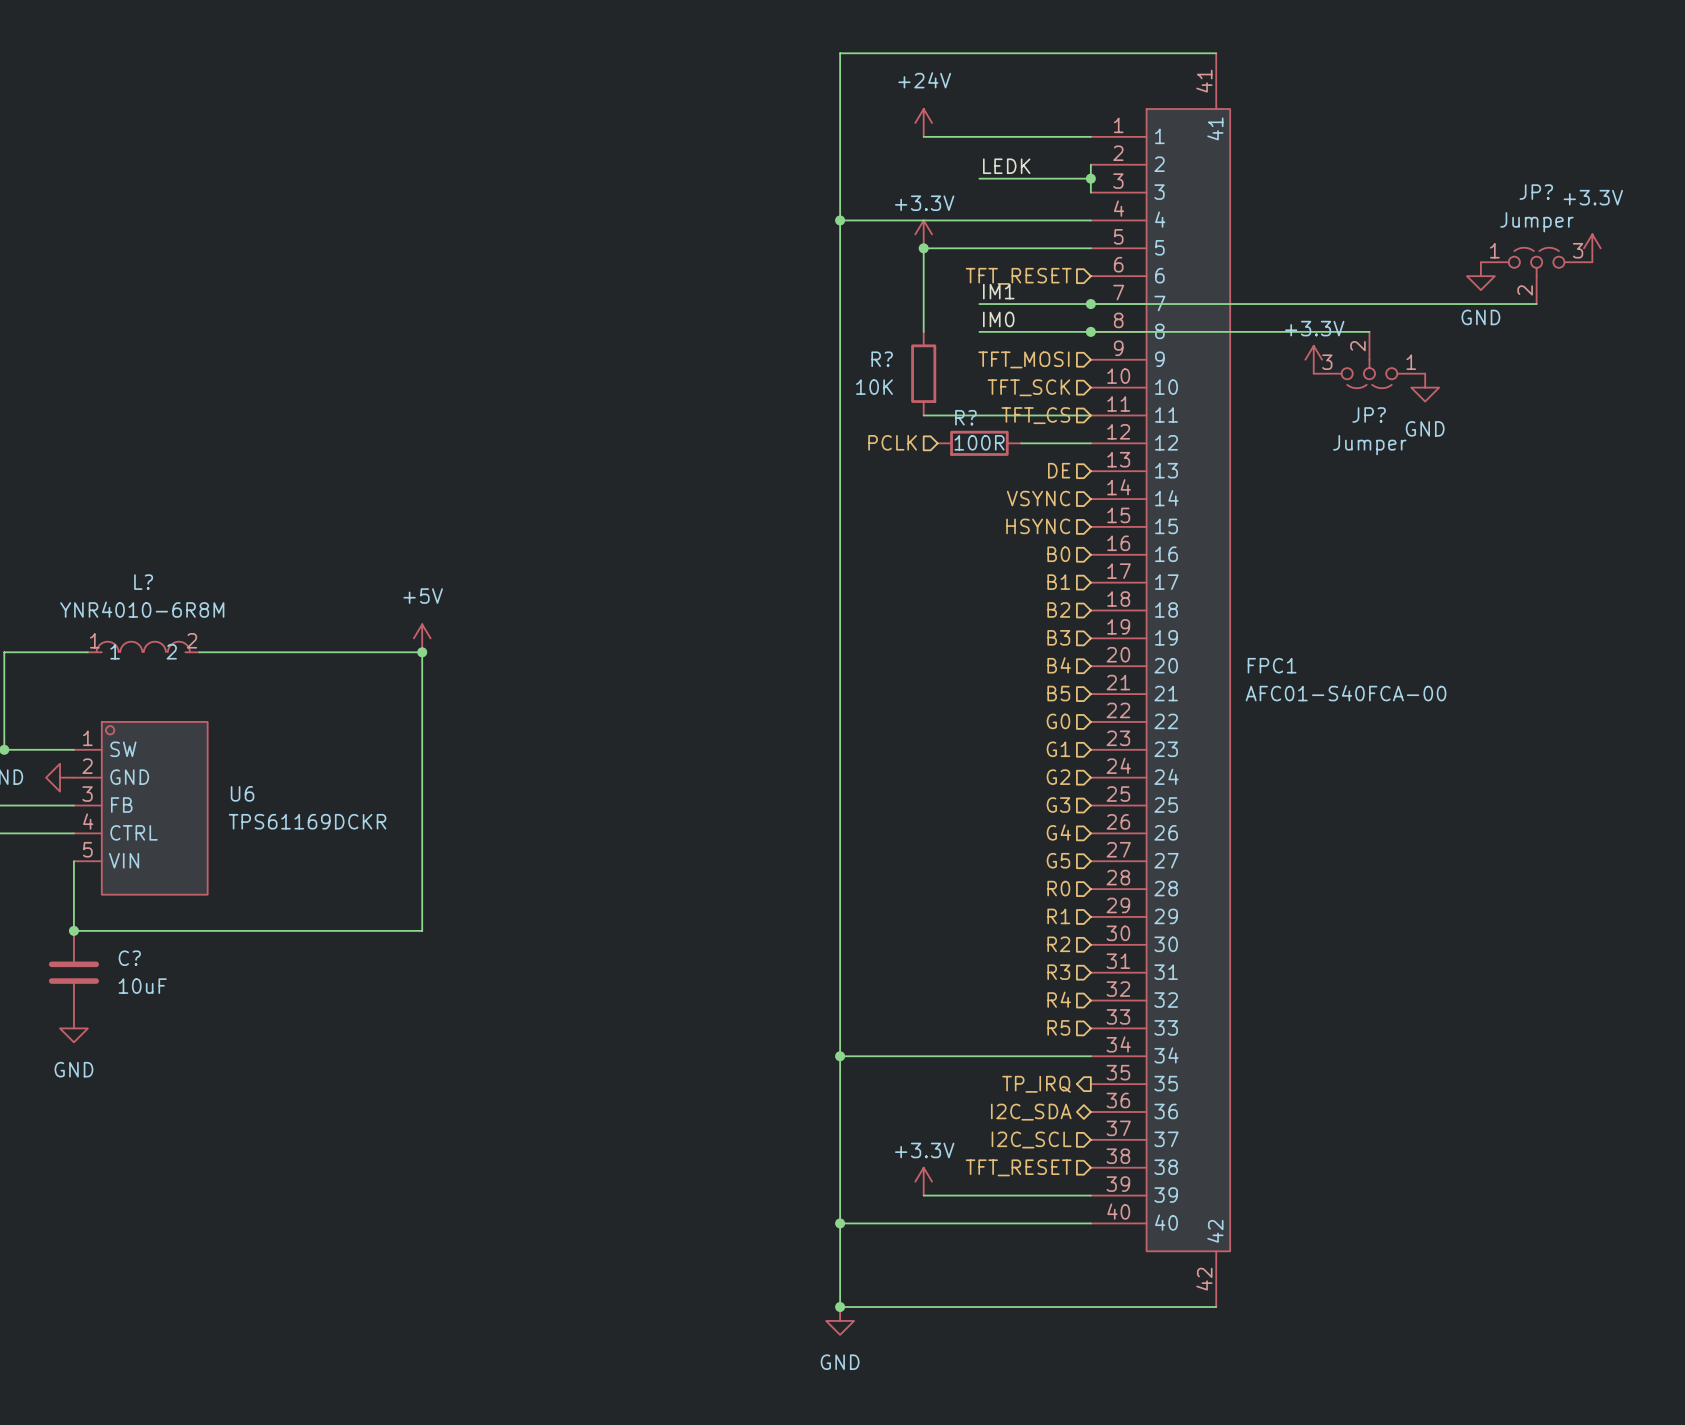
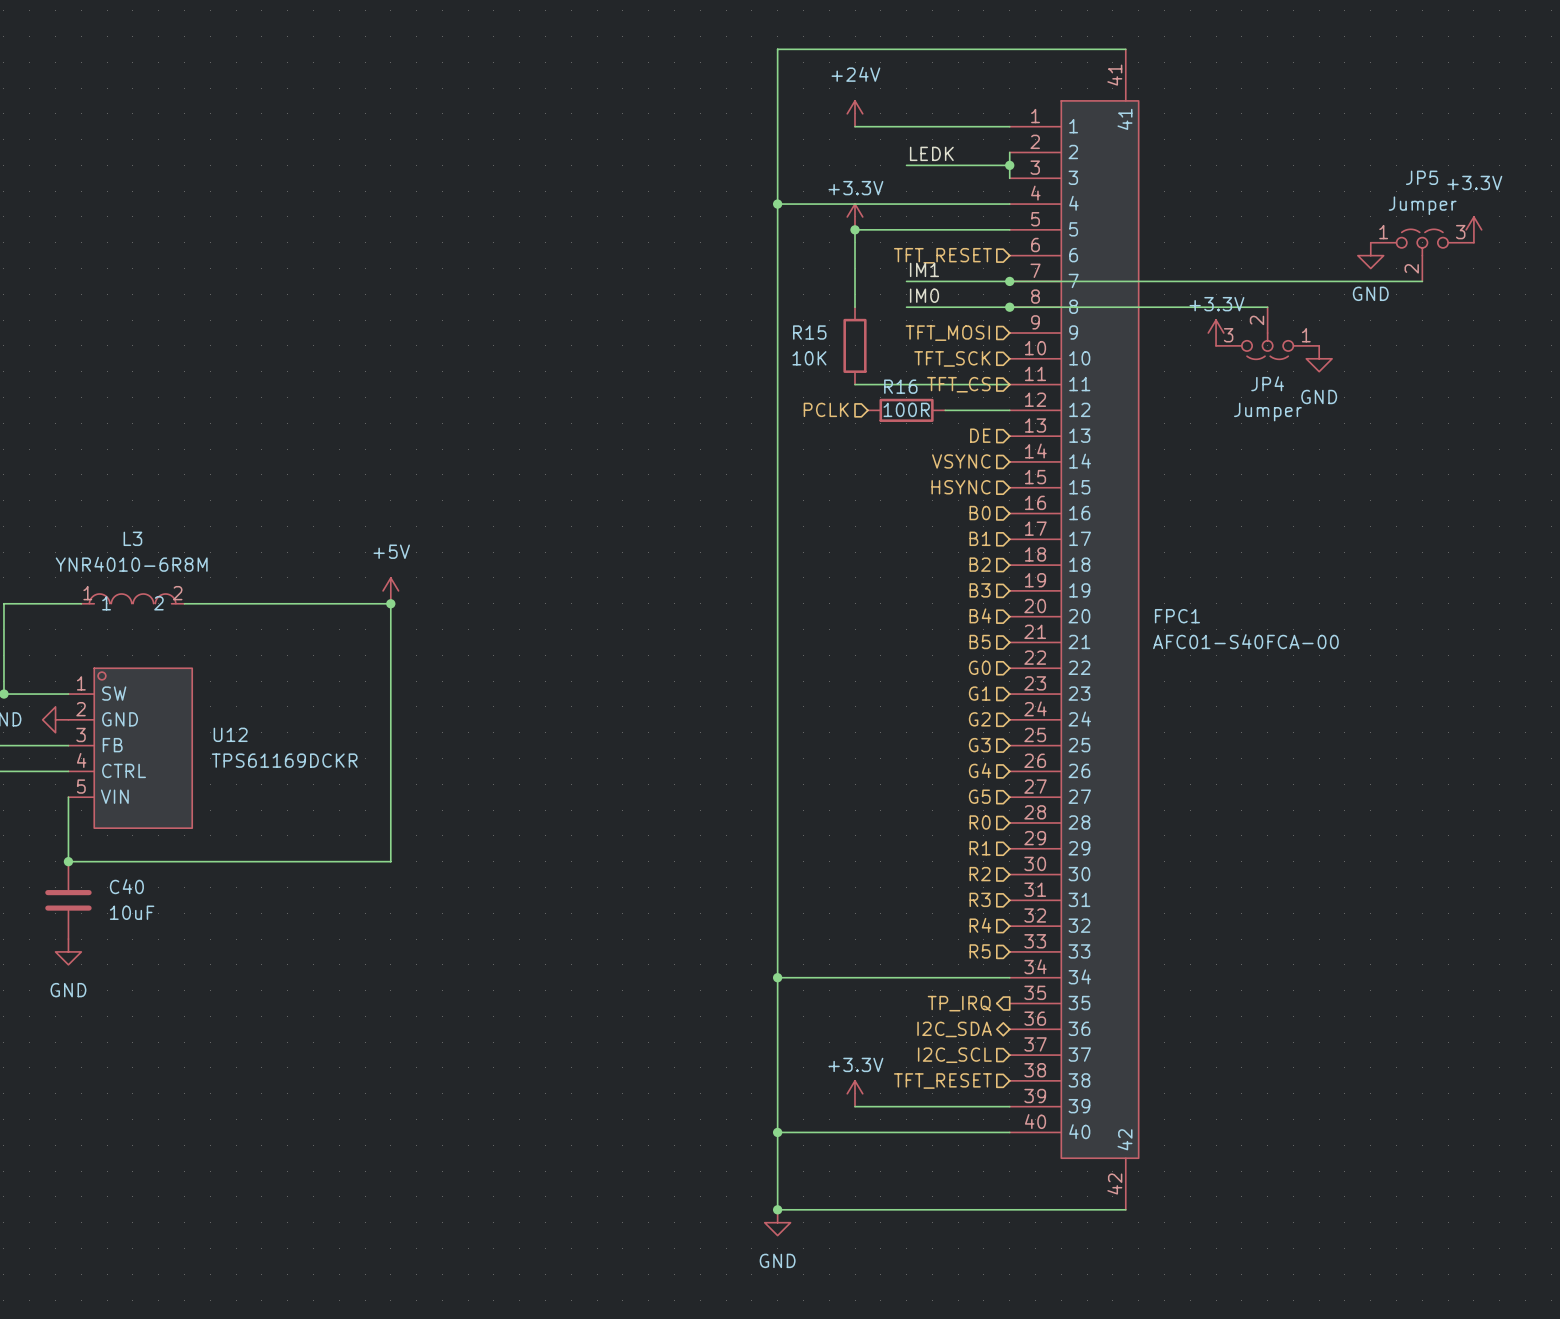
JP? name: JP? (1536, 192) -> JP5 (1422, 177)
R? name: R? (882, 359) -> R15 (809, 332)
JP? name: JP? (1369, 414) -> JP4 (1267, 383)
R? name: R? (965, 417) -> R16 (900, 386)
L? name: L? (143, 582) -> L3 (132, 538)
U6 name: U6 (242, 793) -> U12 (230, 734)
C? name: C? (129, 958) -> C40 (126, 886)

